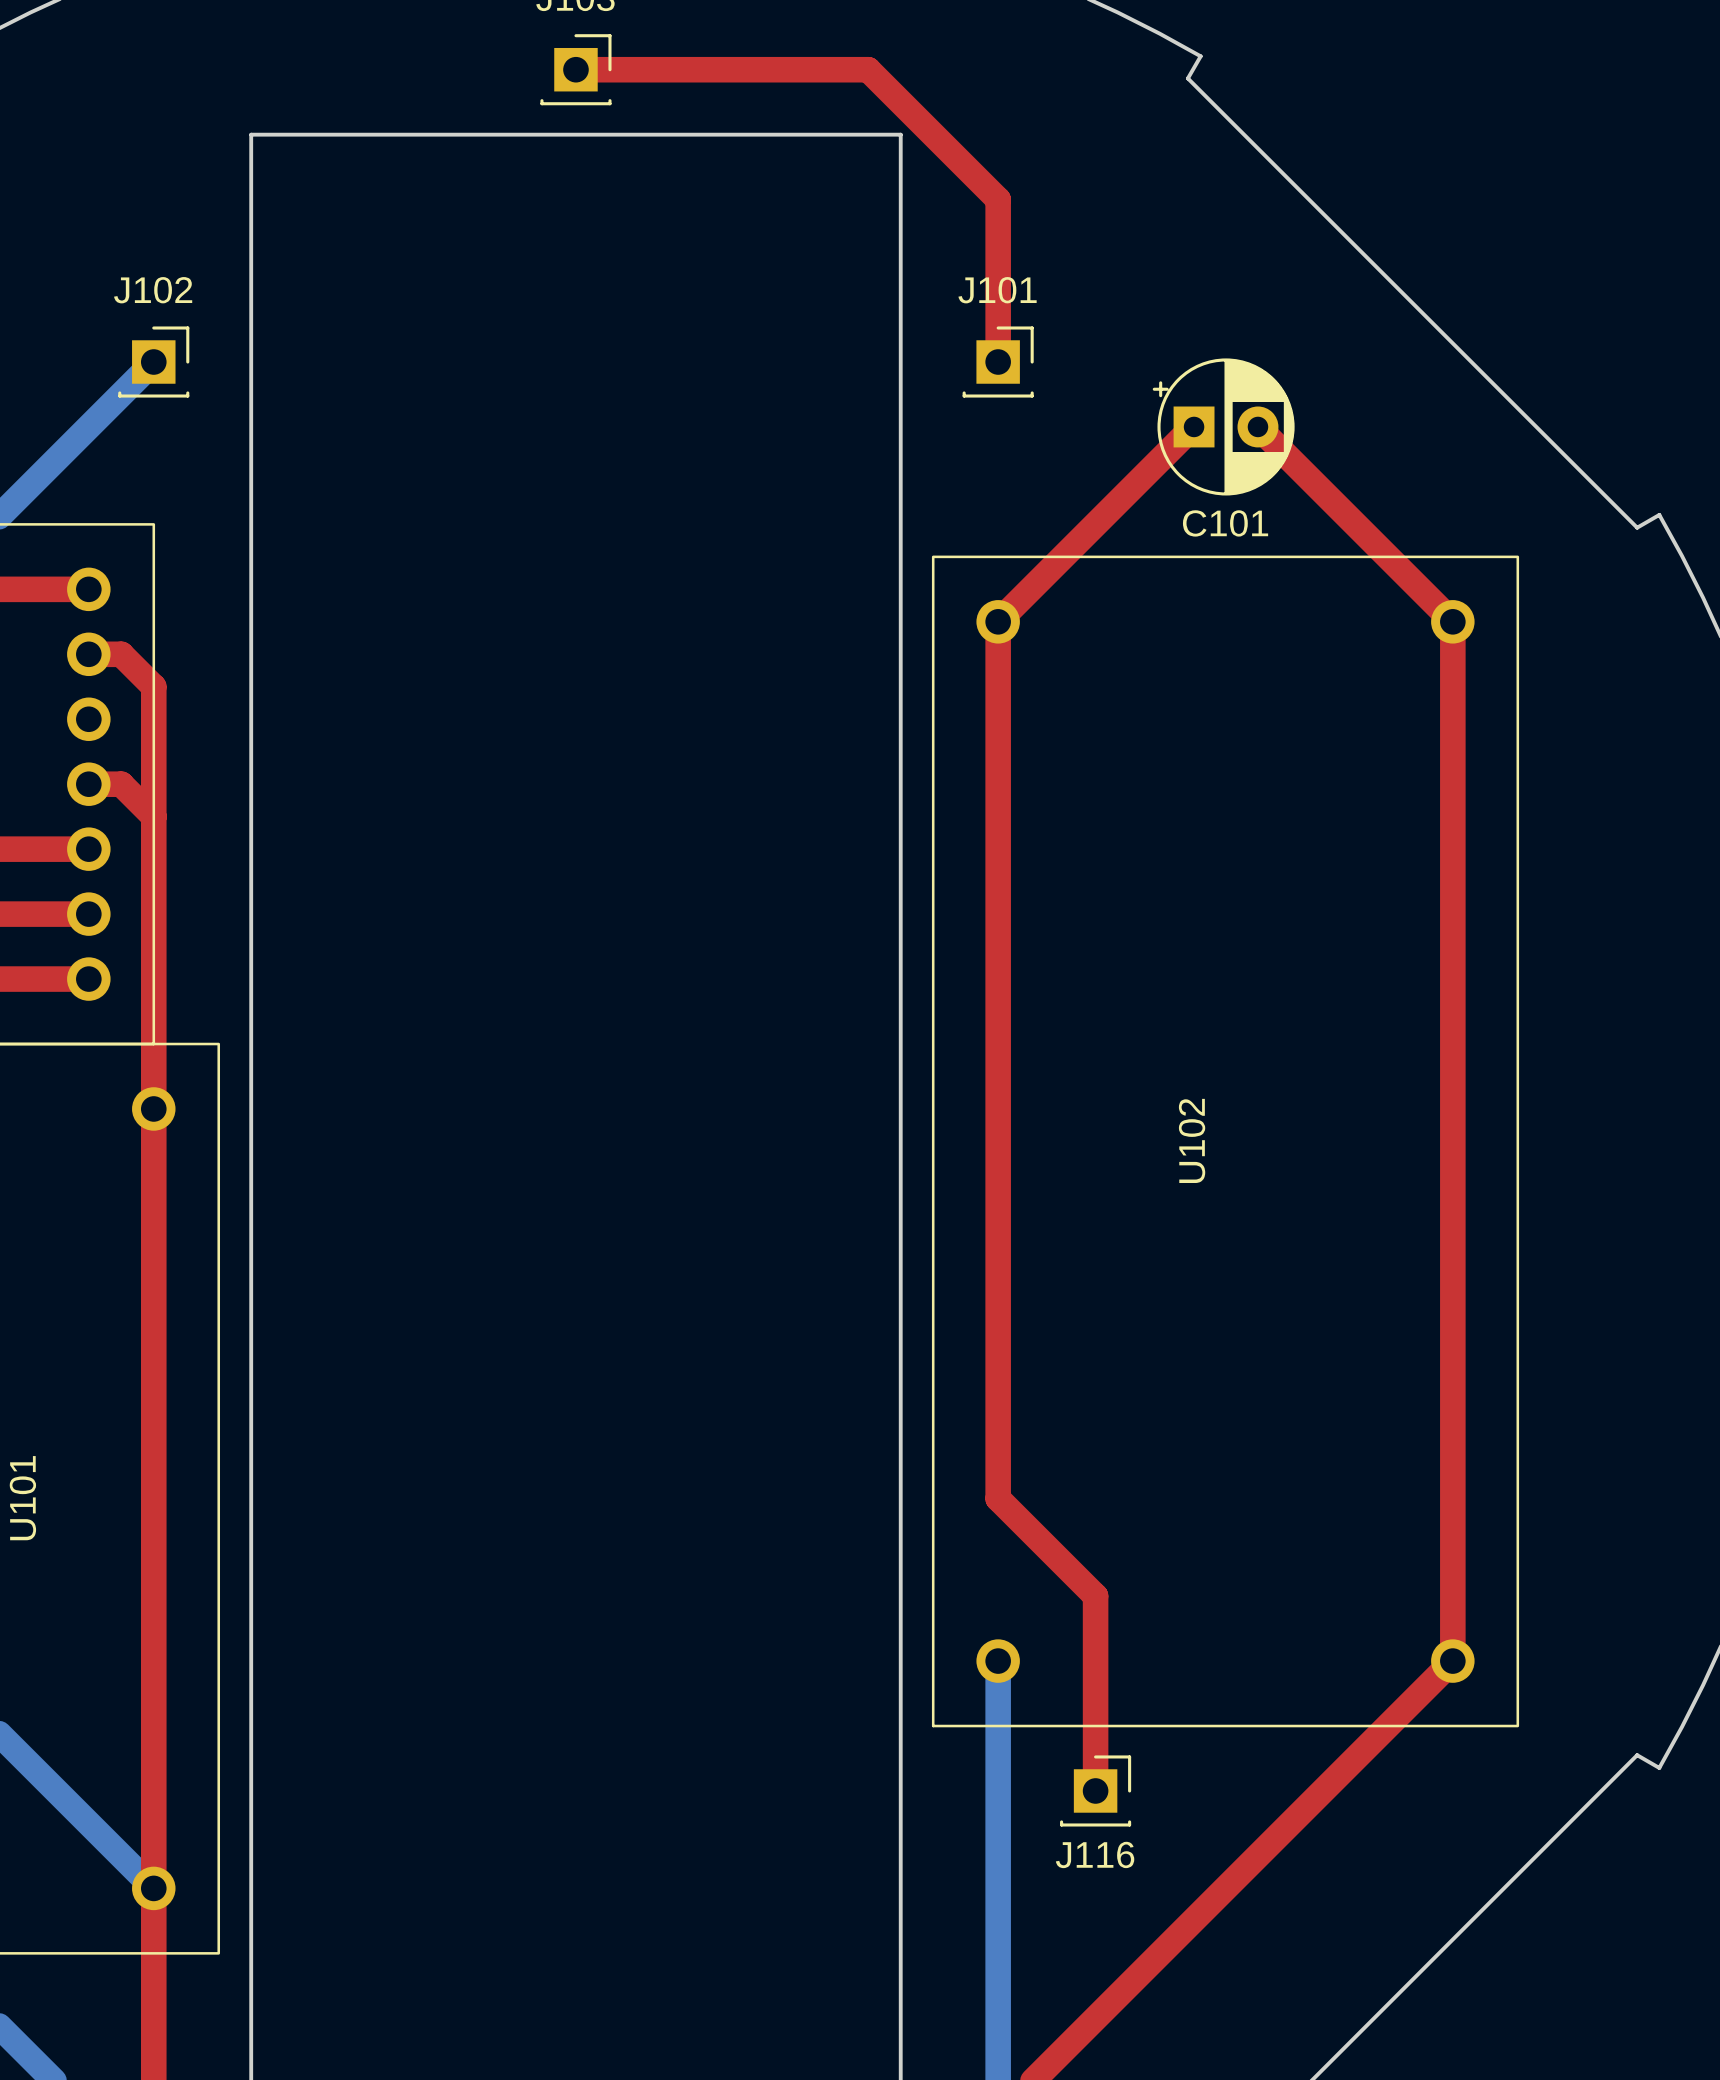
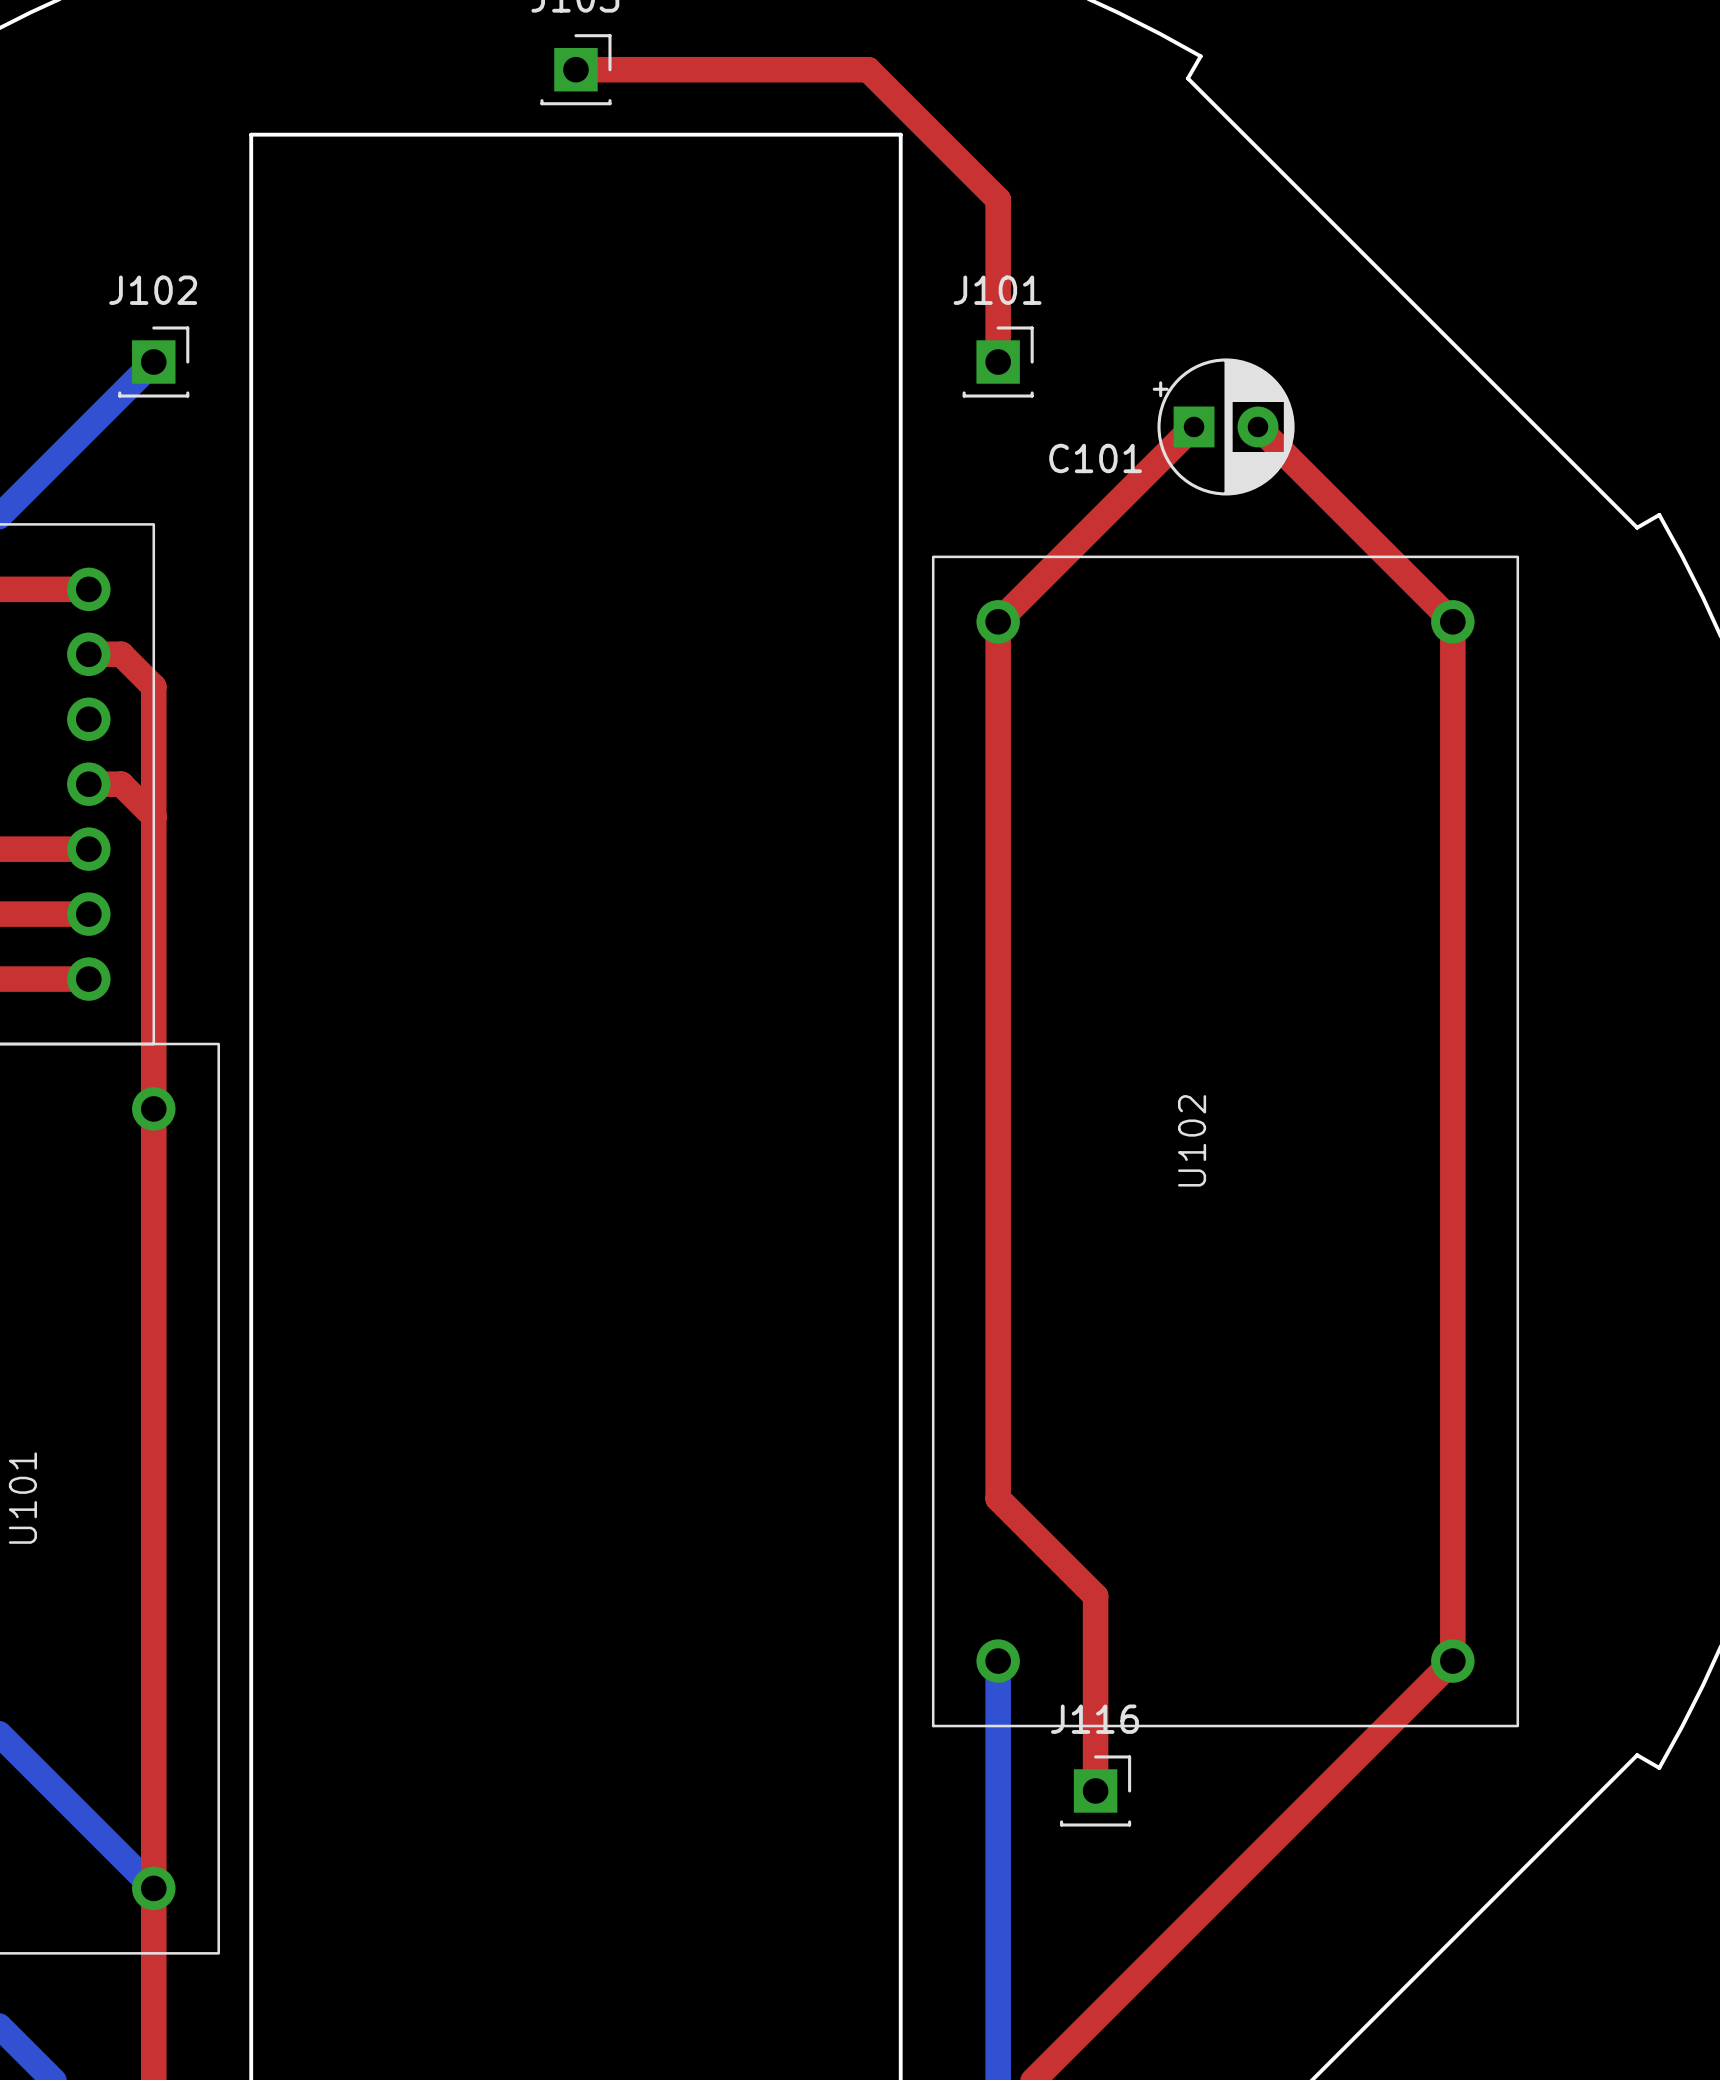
C101 name position: C101 (1225, 523) -> C101 (1095, 458)
J116 name position: J116 (1095, 1854) -> J116 (1094, 1719)

